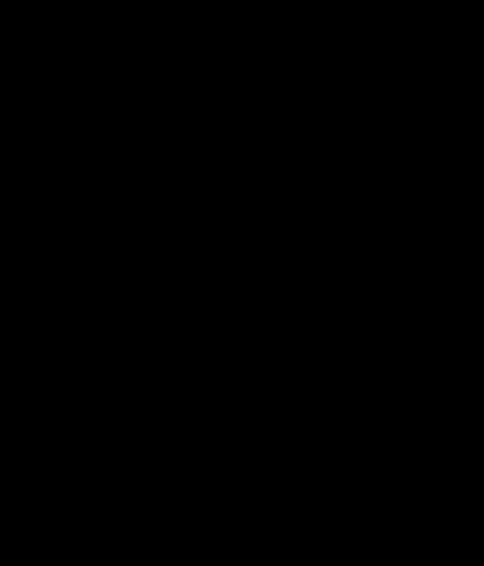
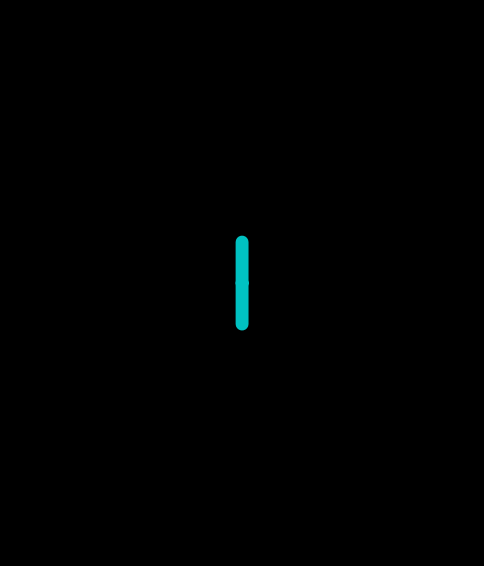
line: none -> (242, 242) (242, 324)

